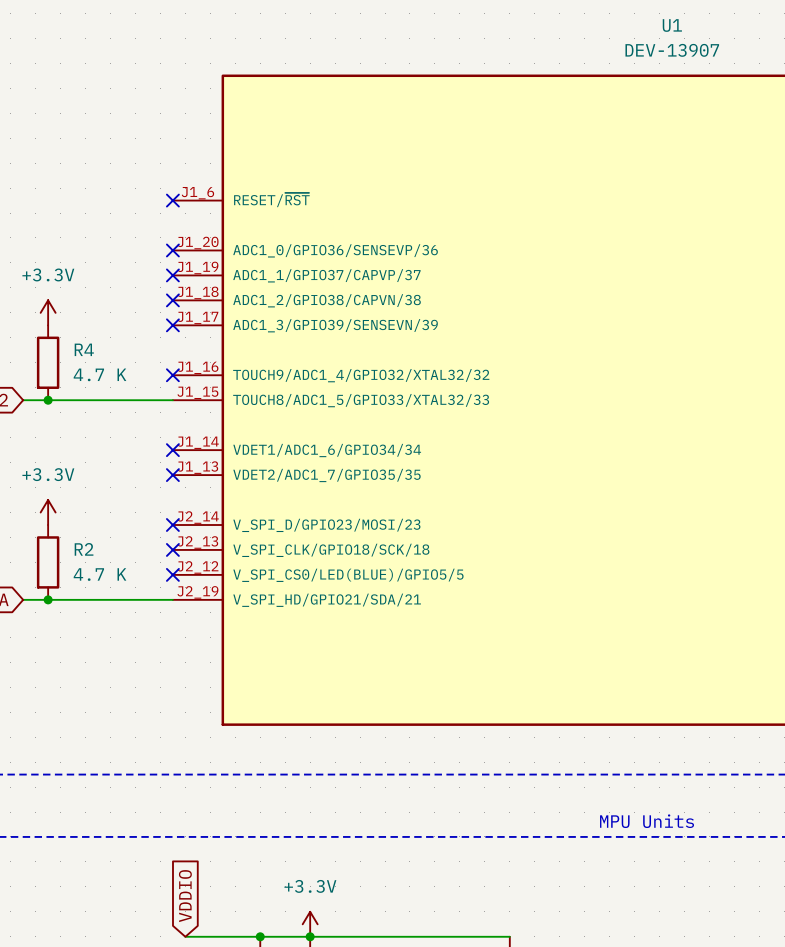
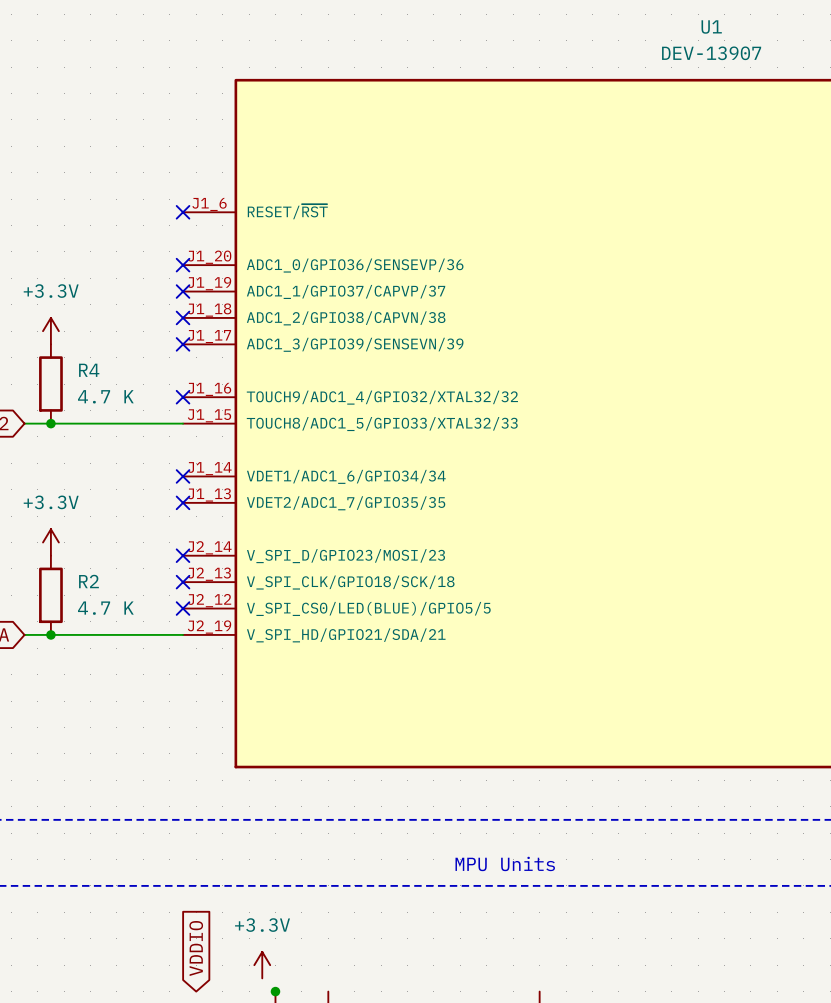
text position: MPU Units (647, 821) -> MPU Units (505, 863)
power symbol position: +3.3V (310, 924) -> +3.3V (262, 965)
wire: (185, 936) (509, 936) -> none
junction: (310, 936) -> none

